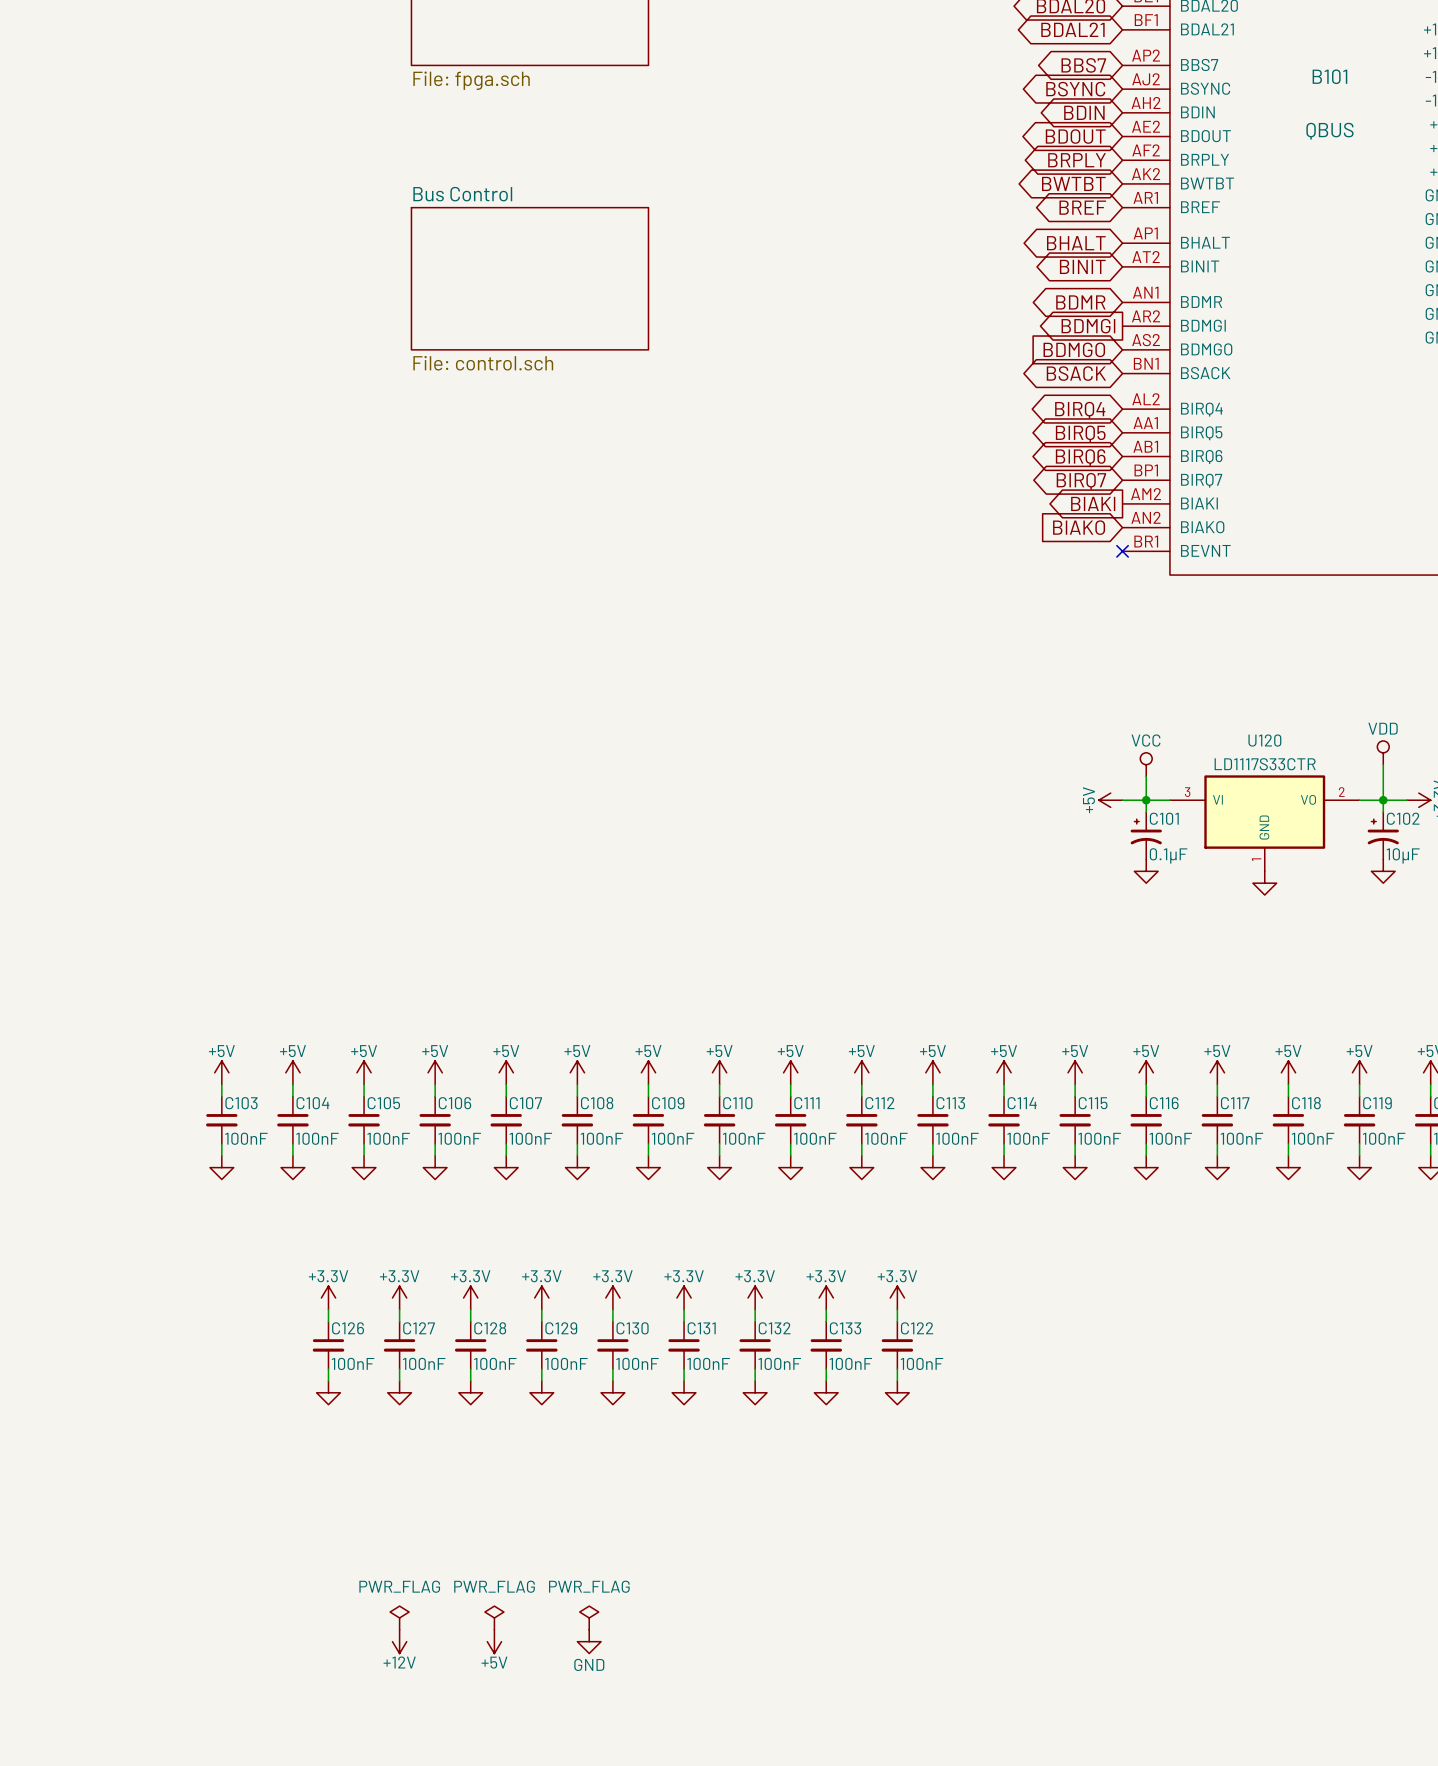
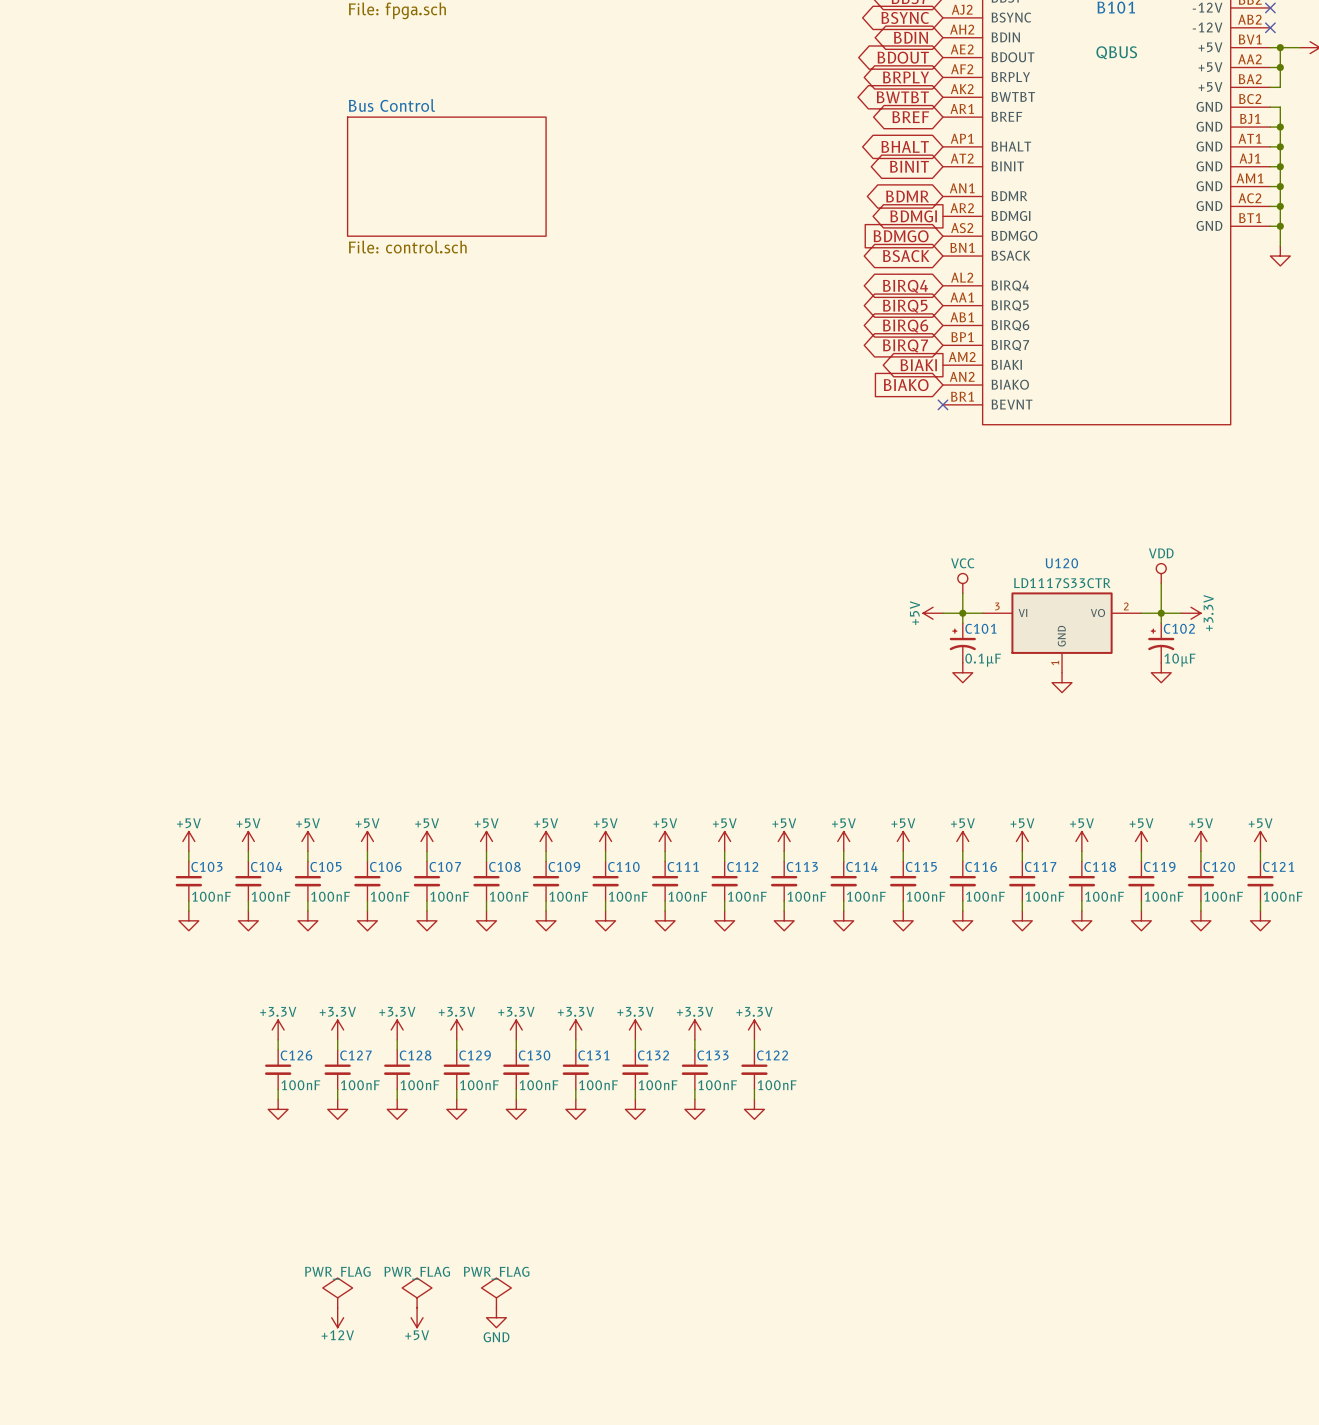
power symbol shape: [390, 1606, 410, 1630] -> [322, 1278, 353, 1308]
power symbol shape: [484, 1606, 504, 1630] -> [402, 1278, 432, 1308]
power symbol shape: [579, 1606, 599, 1630] -> [481, 1278, 512, 1308]

